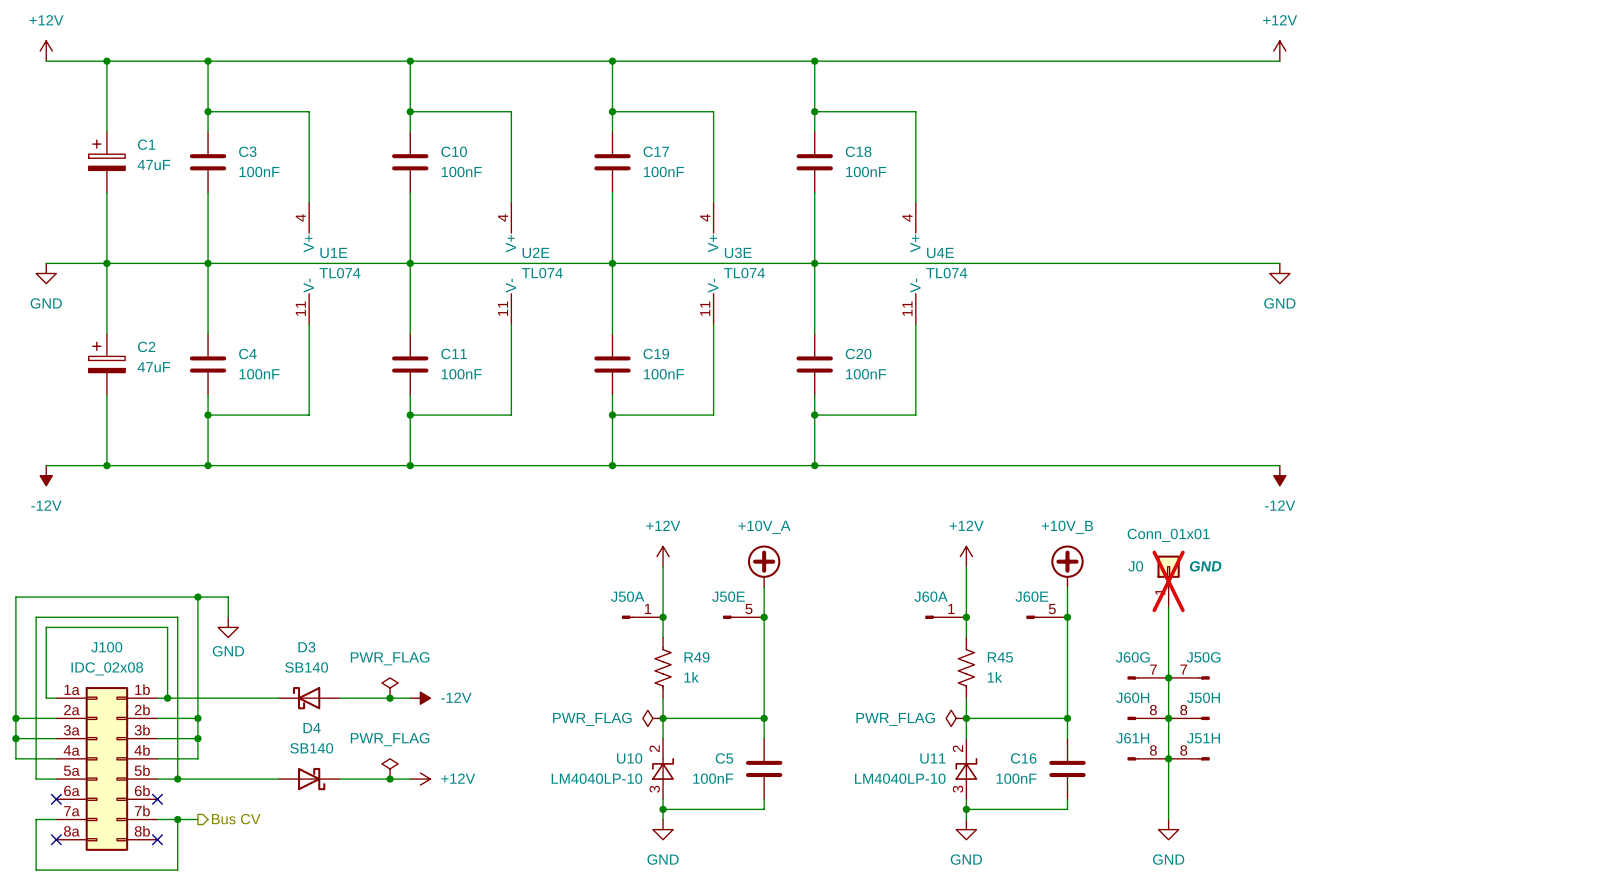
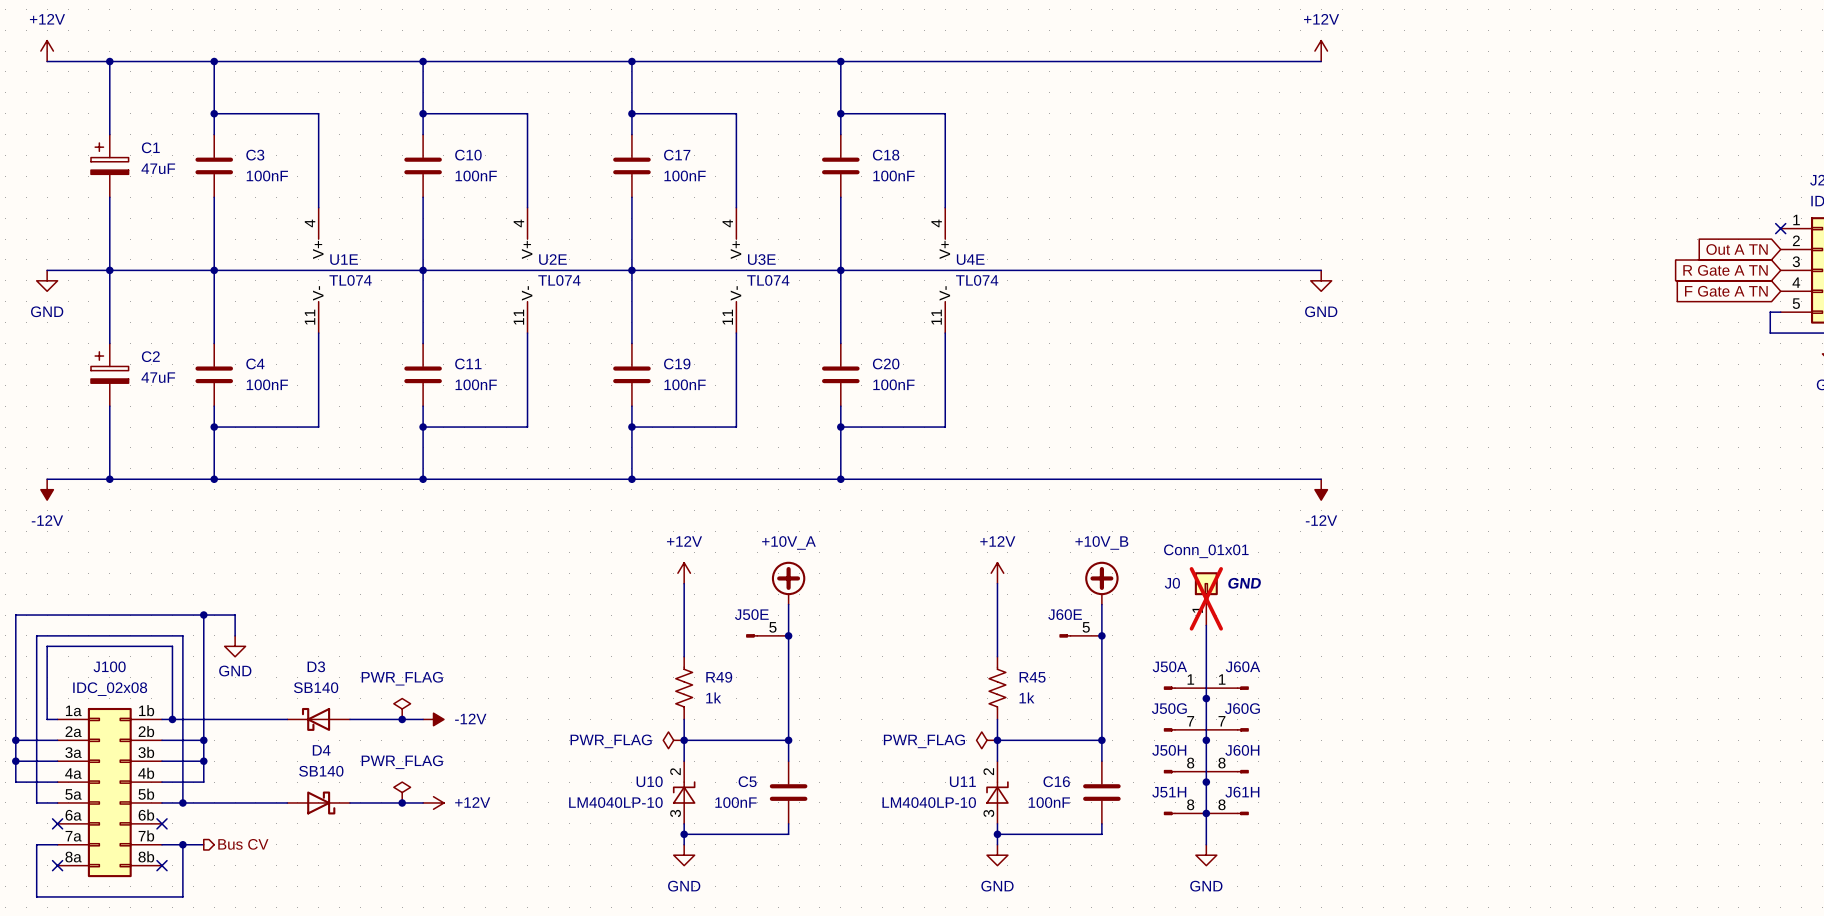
J60A name position: J60A (931, 596) -> J60A (1242, 666)
J50A position: (642, 617) -> (1185, 688)
junction: (663, 617) -> none
J60A rotation: 0° (930, 617) -> 180° (1242, 688)
J60A position: (945, 617) -> (1227, 688)
junction: (966, 617) -> none
J60G name position: J60G (1132, 657) -> J60G (1242, 708)
J50G name position: J50G (1203, 657) -> J50G (1169, 708)
J60G rotation: 0° (1133, 677) -> 180° (1242, 729)
J60G position: (1148, 677) -> (1227, 729)
J50G position: (1189, 677) -> (1185, 729)
J50G rotation: 0° (1204, 677) -> 180° (1169, 729)
J60H name position: J60H (1132, 697) -> J60H (1242, 750)
J50H name position: J50H (1203, 697) -> J50H (1169, 750)
J60H rotation: 0° (1133, 718) -> 180° (1242, 771)
J60H position: (1148, 718) -> (1227, 771)
J50H position: (1189, 718) -> (1185, 771)
J50H rotation: 0° (1204, 718) -> 180° (1169, 771)
J61H name position: J61H (1132, 738) -> J61H (1242, 792)
J51H name position: J51H (1203, 738) -> J51H (1169, 792)
J61H rotation: 0° (1133, 758) -> 180° (1242, 813)
J61H position: (1148, 758) -> (1227, 813)
J51H position: (1189, 758) -> (1185, 813)
J51H rotation: 0° (1204, 758) -> 180° (1169, 813)
junction: none -> (1206, 813)

